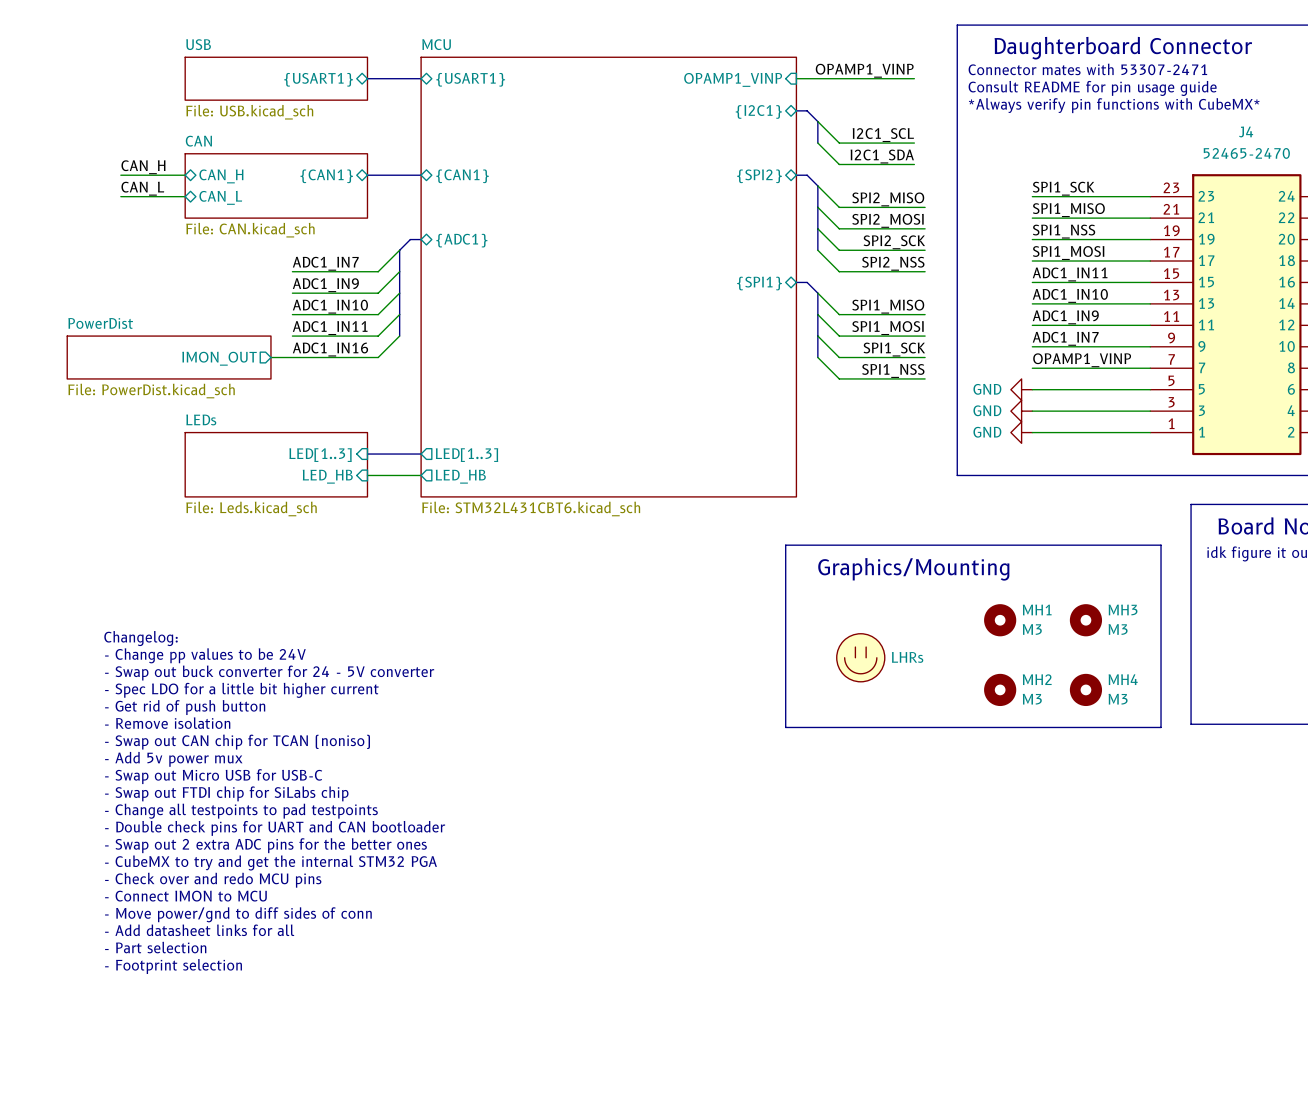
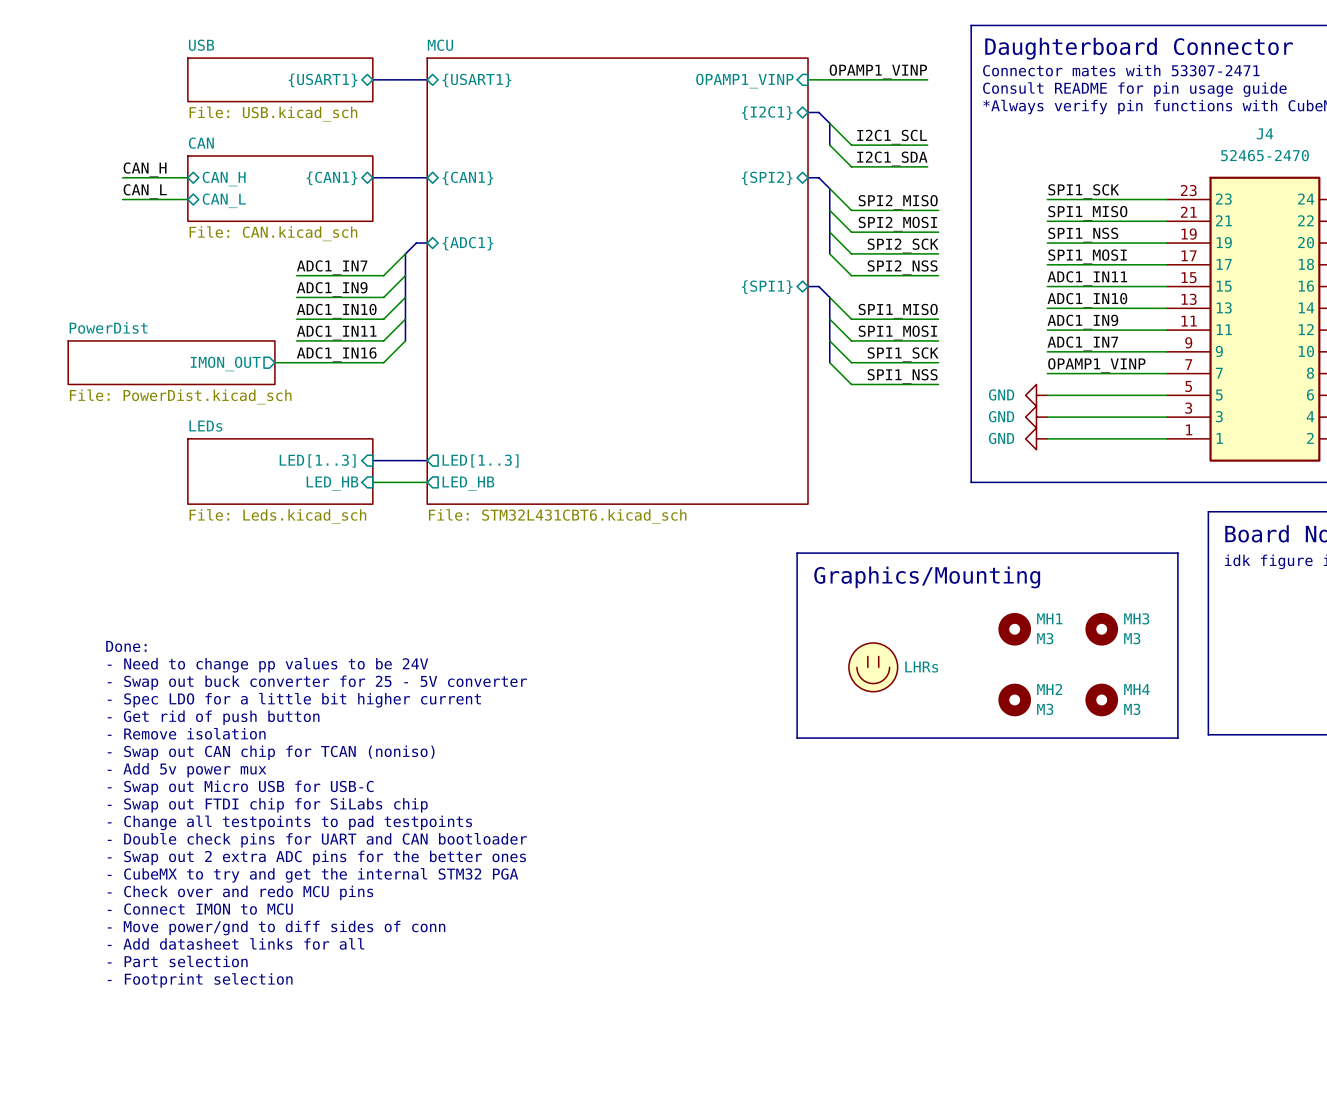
text: Changelog: (141, 638) -> Done: (126, 646)
text: - Change pp values to be 24V (205, 655) -> - Need to change pp values to be 24V (267, 665)
text: - Swap out buck converter for 24 - 5V converter (269, 673) -> - Swap out buck converter for 25 - 5V converter (317, 682)

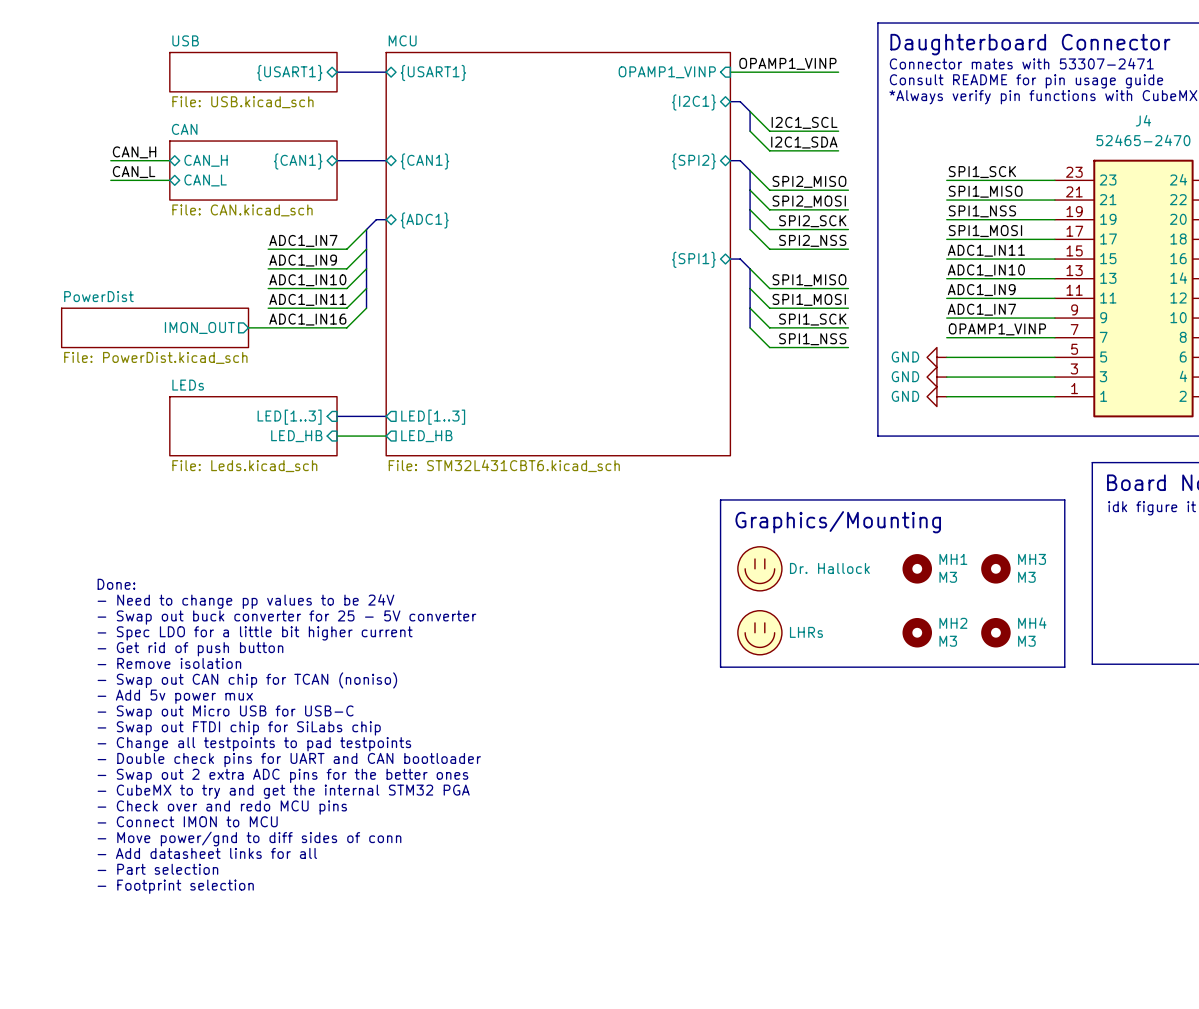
part: none -> Dr. Hallock (759, 568)
part position: (873, 667) -> (759, 632)

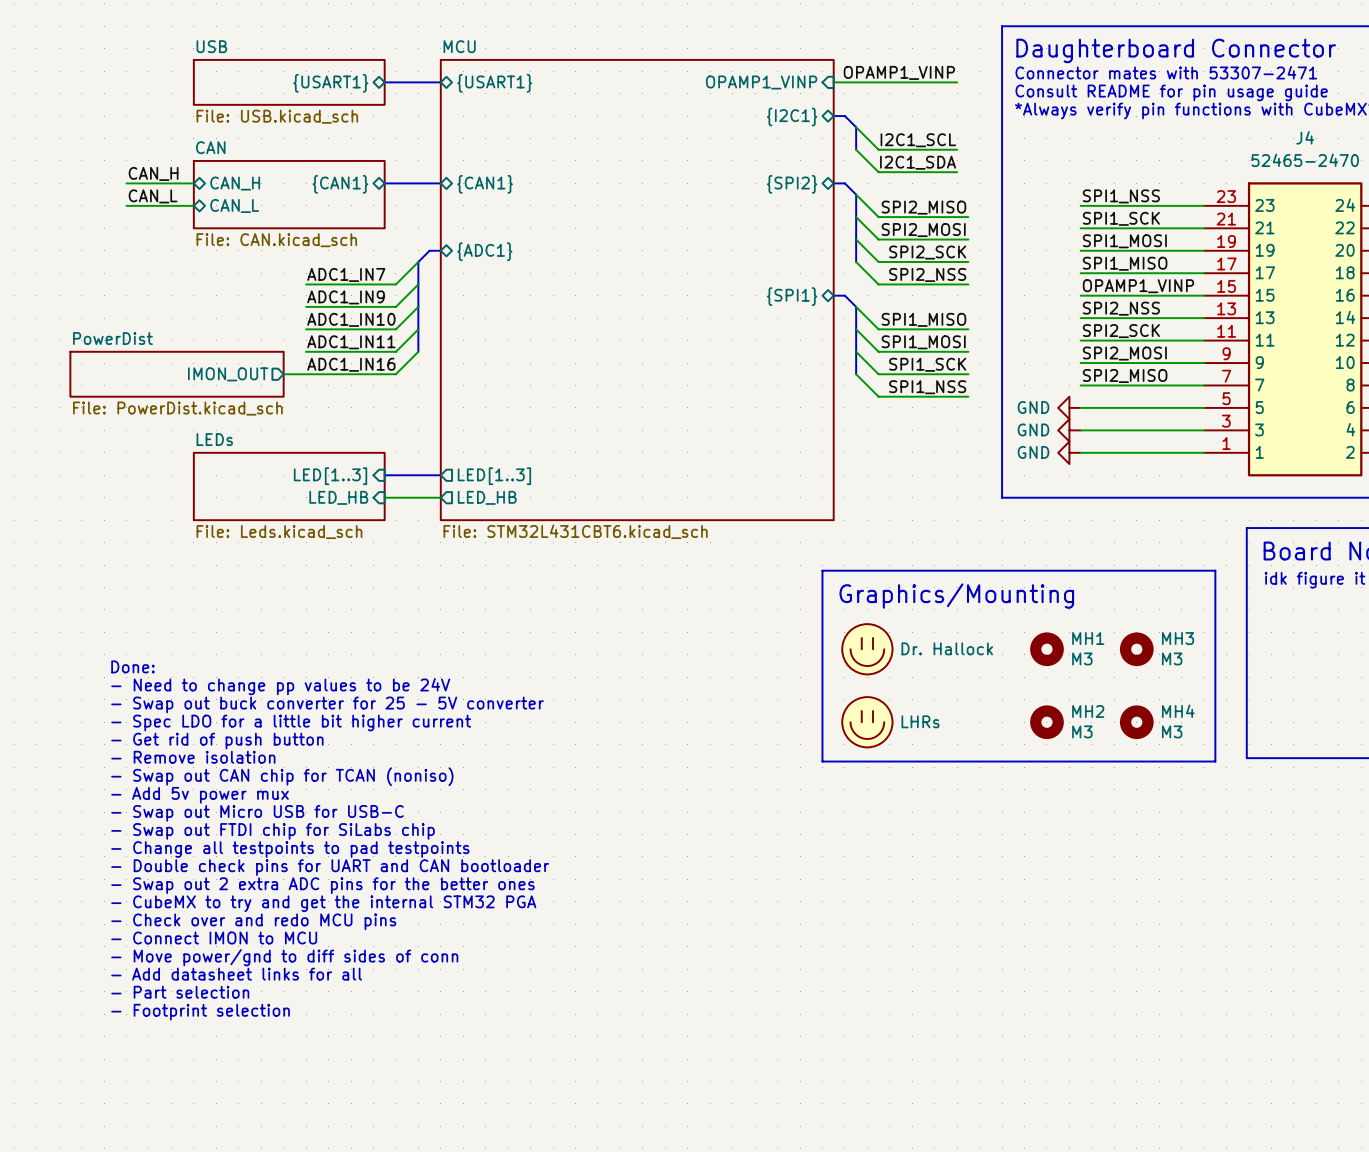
label: SPI1_SCK (982, 172) -> SPI1_NSS (1121, 196)
label: SPI1_MISO (985, 191) -> SPI1_SCK (1121, 218)
label: SPI1_NSS (982, 211) -> SPI1_MOSI (1124, 241)
label: SPI1_MOSI (985, 231) -> SPI1_MISO (1125, 263)
label: ADC1_IN11 (986, 250) -> OPAMP1_VINP (1138, 286)
label: ADC1_IN10 (986, 270) -> SPI2_NSS (1121, 308)
label: ADC1_IN9 (981, 290) -> SPI2_SCK (1121, 331)
label: ADC1_IN7 (981, 309) -> SPI2_MOSI (1124, 353)
label: OPAMP1_VINP (997, 329) -> SPI2_MISO (1125, 375)

